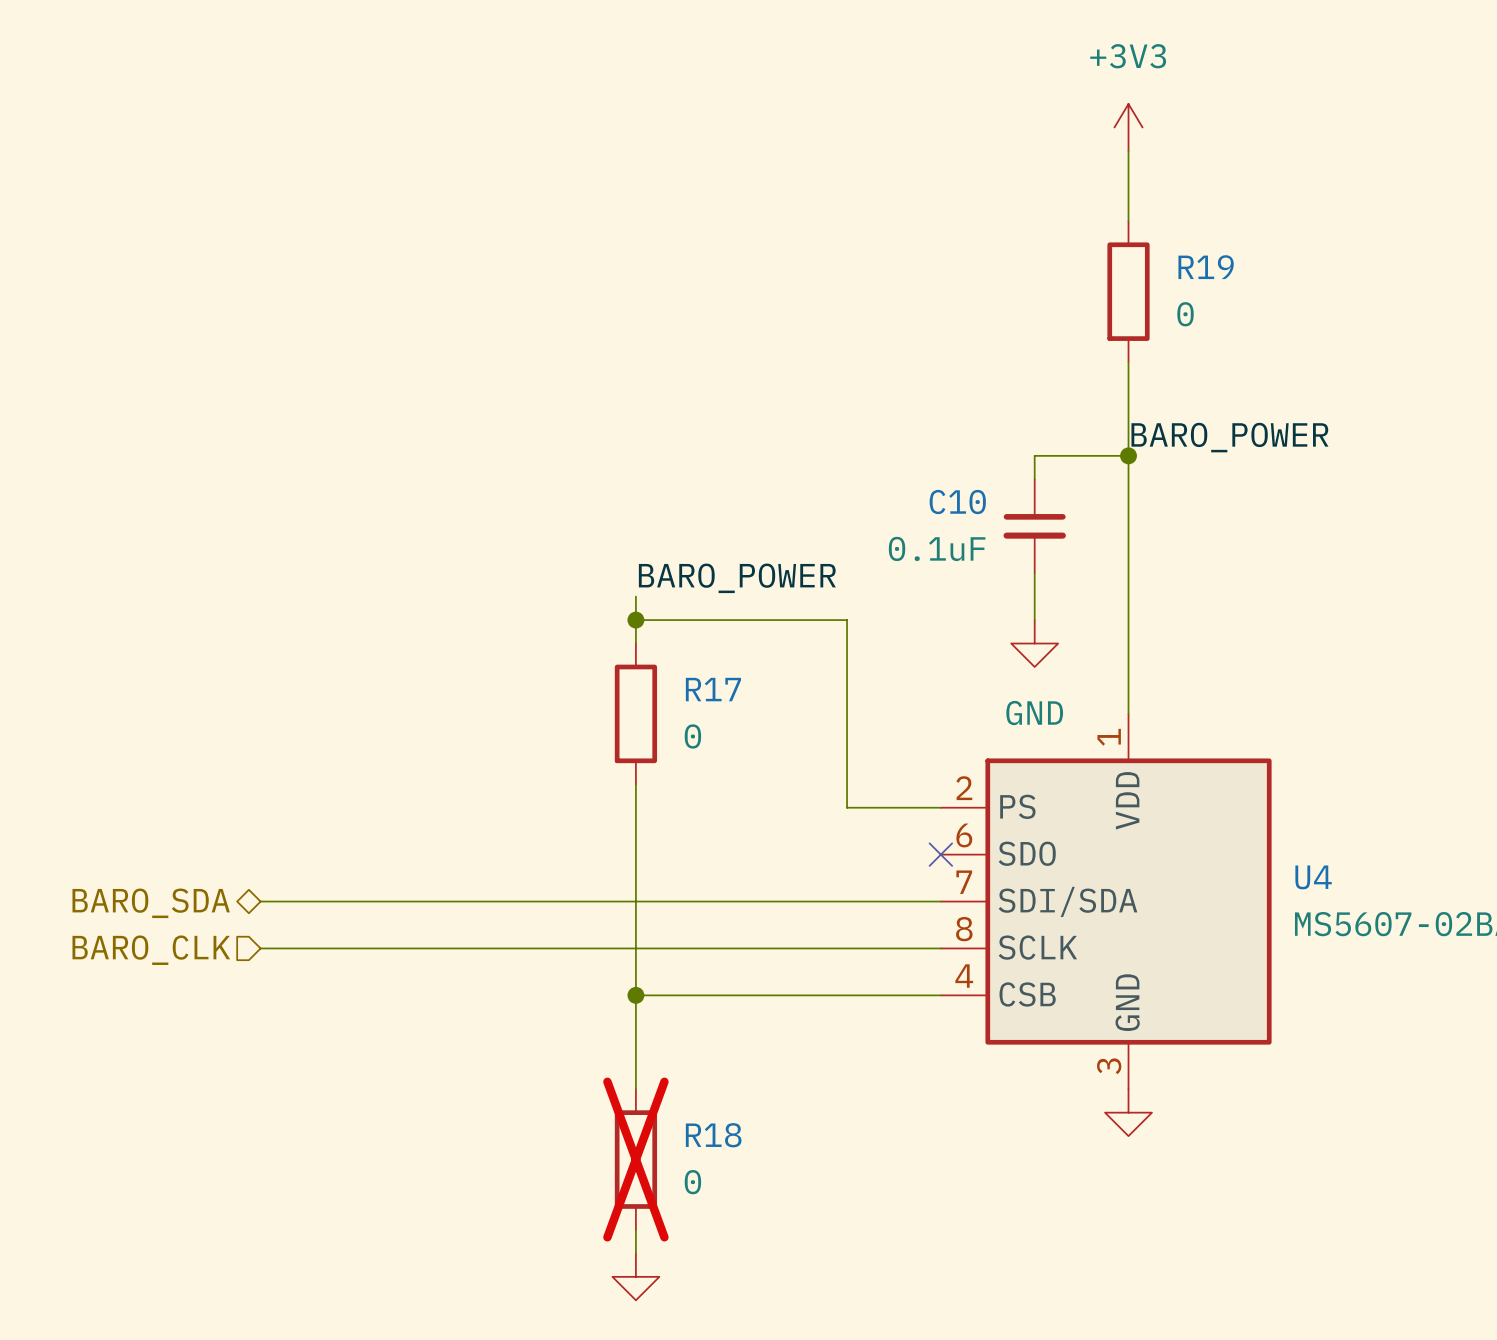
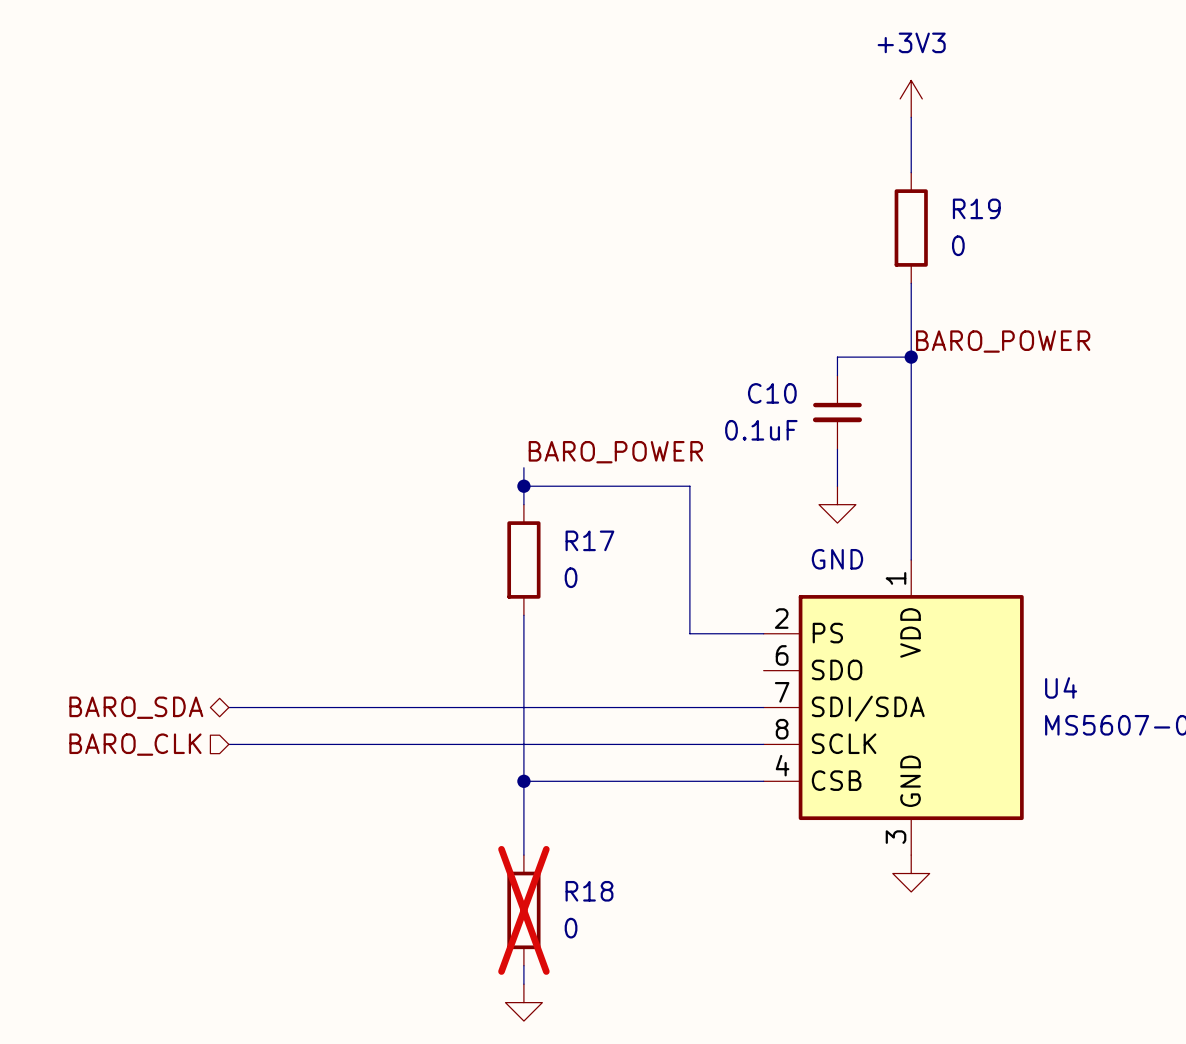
no-connect mark: (940, 854) -> none

